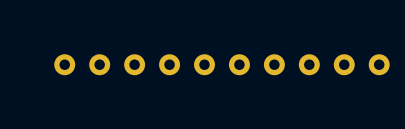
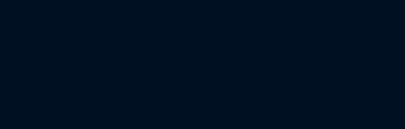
part: (221, 64) -> none

